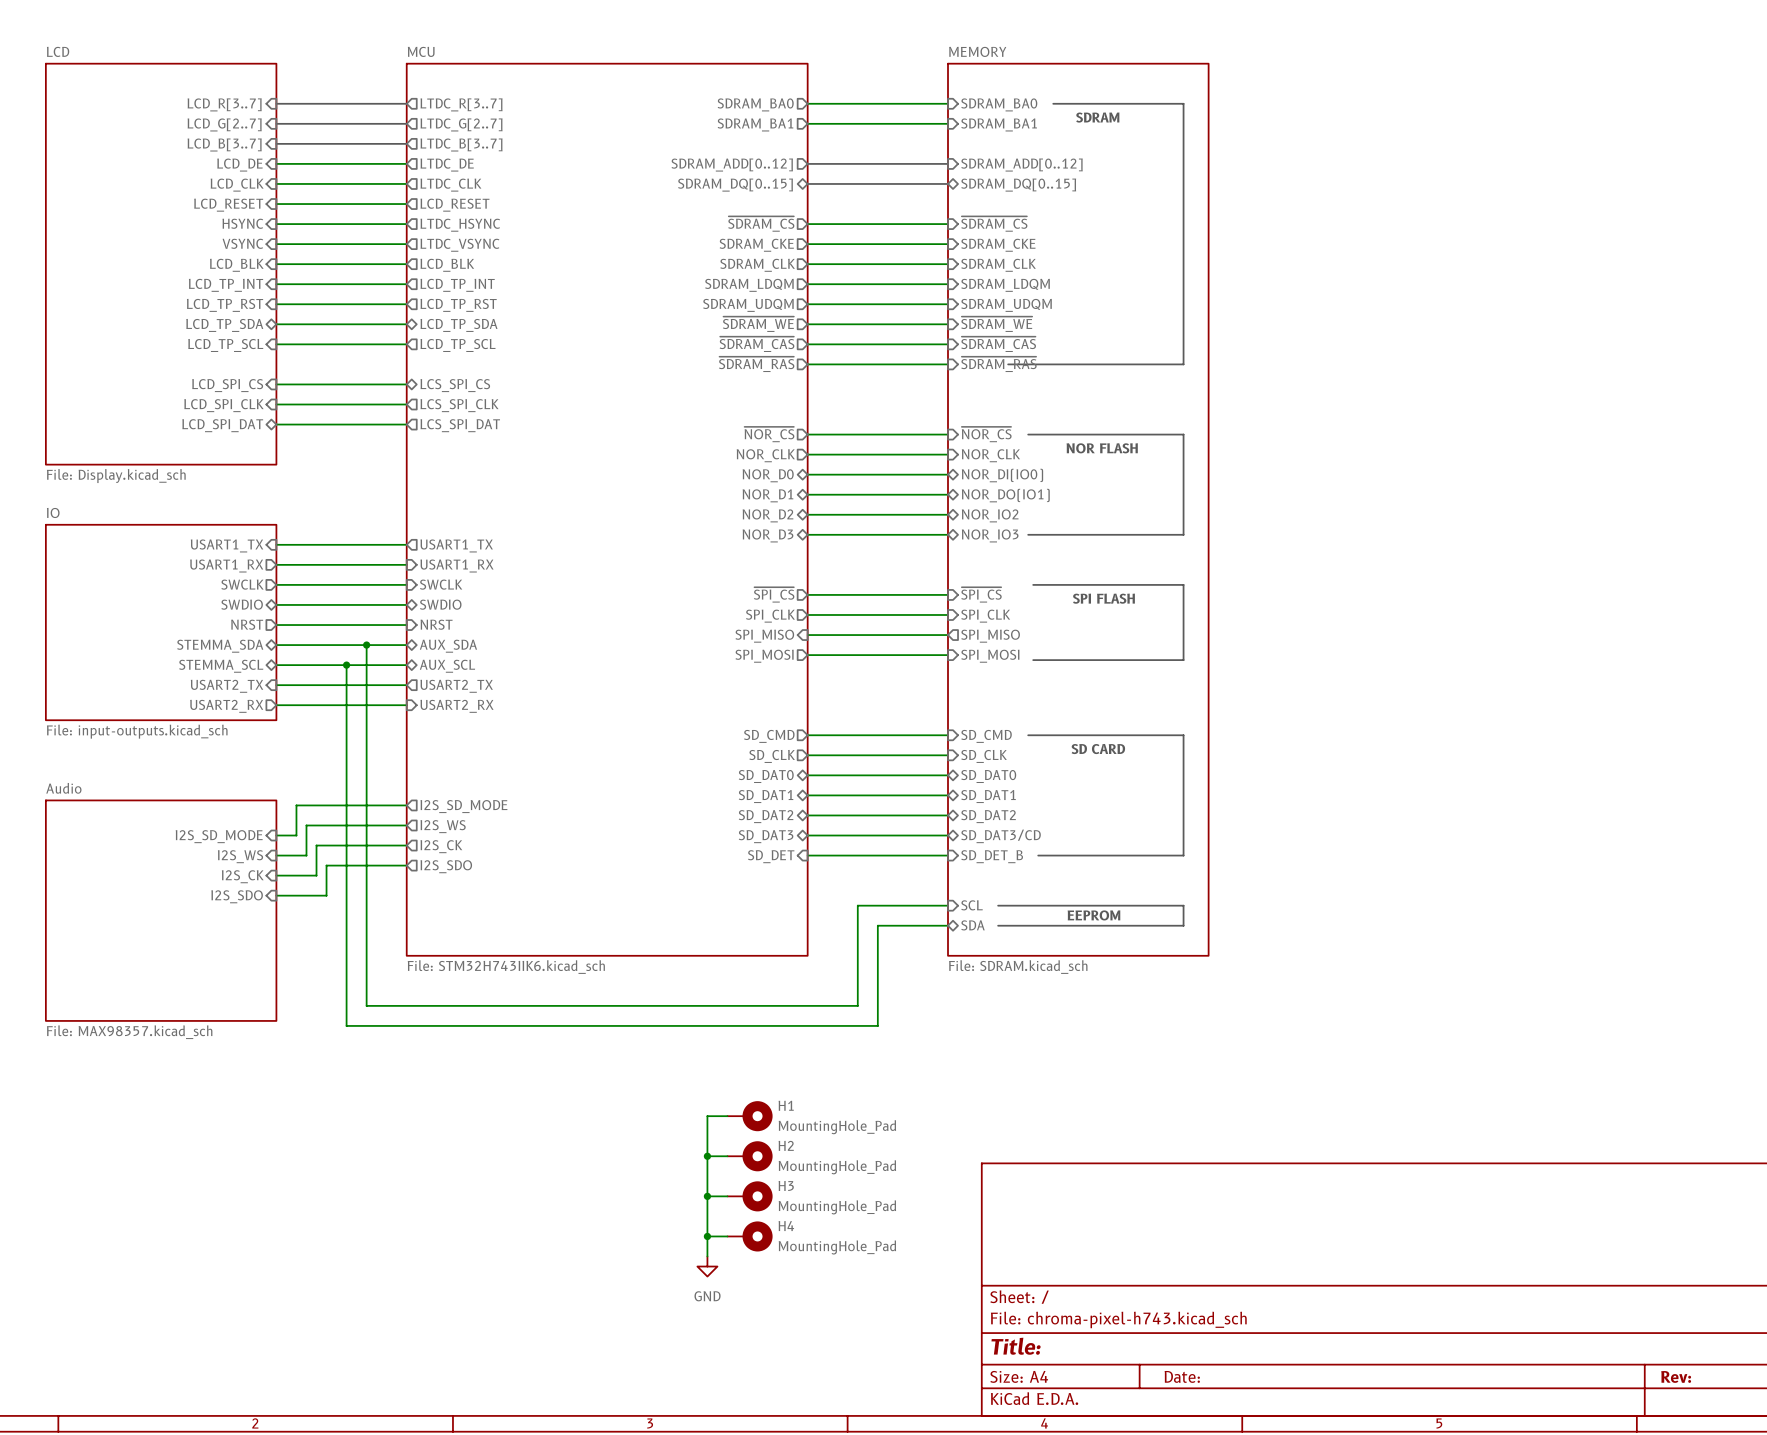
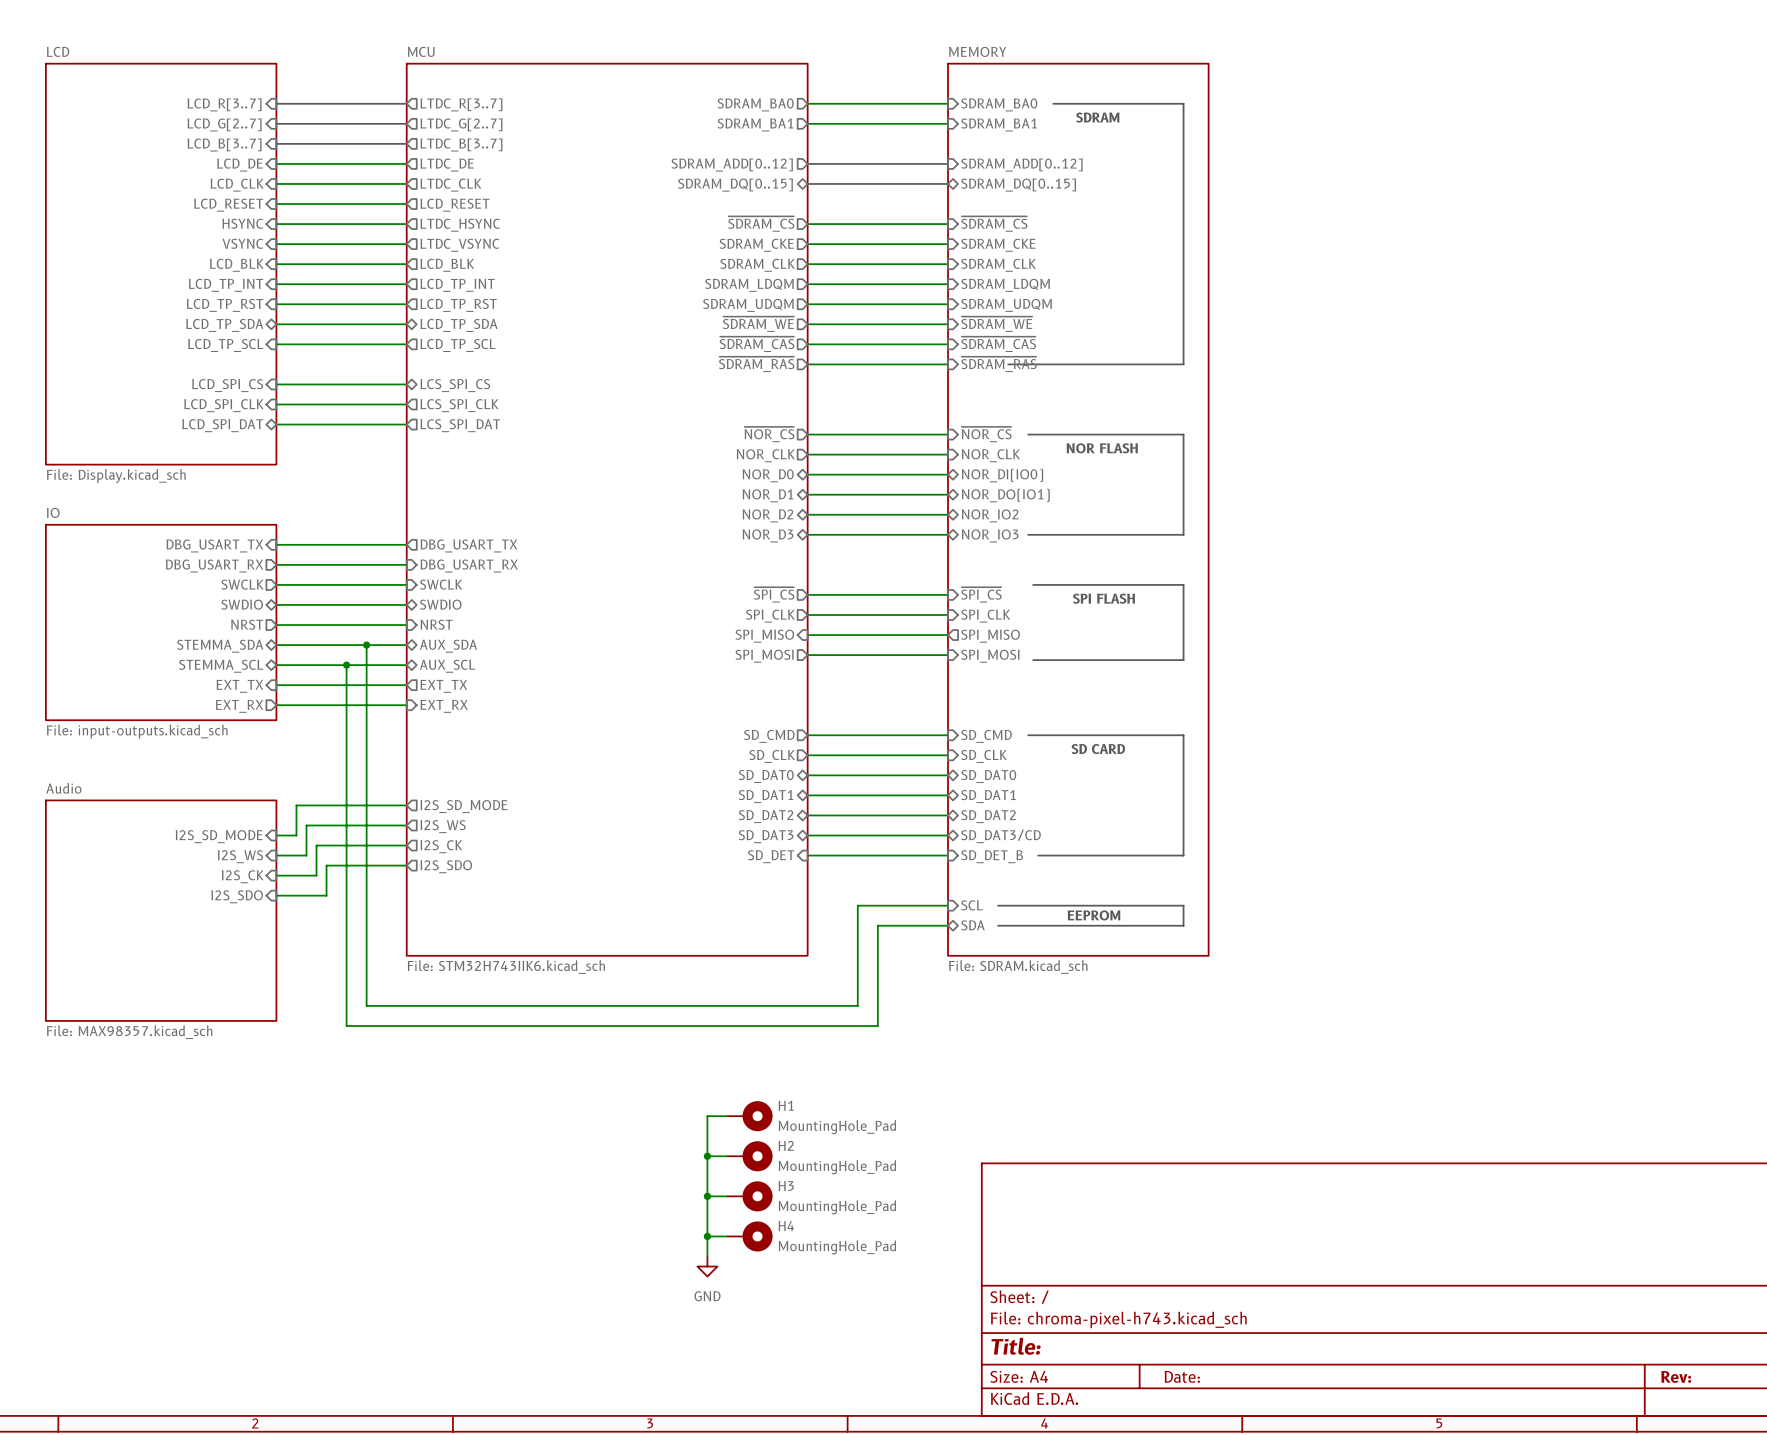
sheet pin: USART1_TX (227, 545) -> DBG_USART_TX (214, 545)
sheet pin: USART1_TX (456, 545) -> DBG_USART_TX (468, 545)
sheet pin: USART1_RX (226, 566) -> DBG_USART_RX (214, 566)
sheet pin: USART1_RX (456, 566) -> DBG_USART_RX (469, 566)
sheet pin: USART2_TX (227, 686) -> EXT_TX (239, 686)
sheet pin: USART2_TX (456, 686) -> EXT_TX (443, 686)
sheet pin: USART2_RX (226, 706) -> EXT_RX (239, 706)
sheet pin: USART2_RX (456, 706) -> EXT_RX (444, 706)

